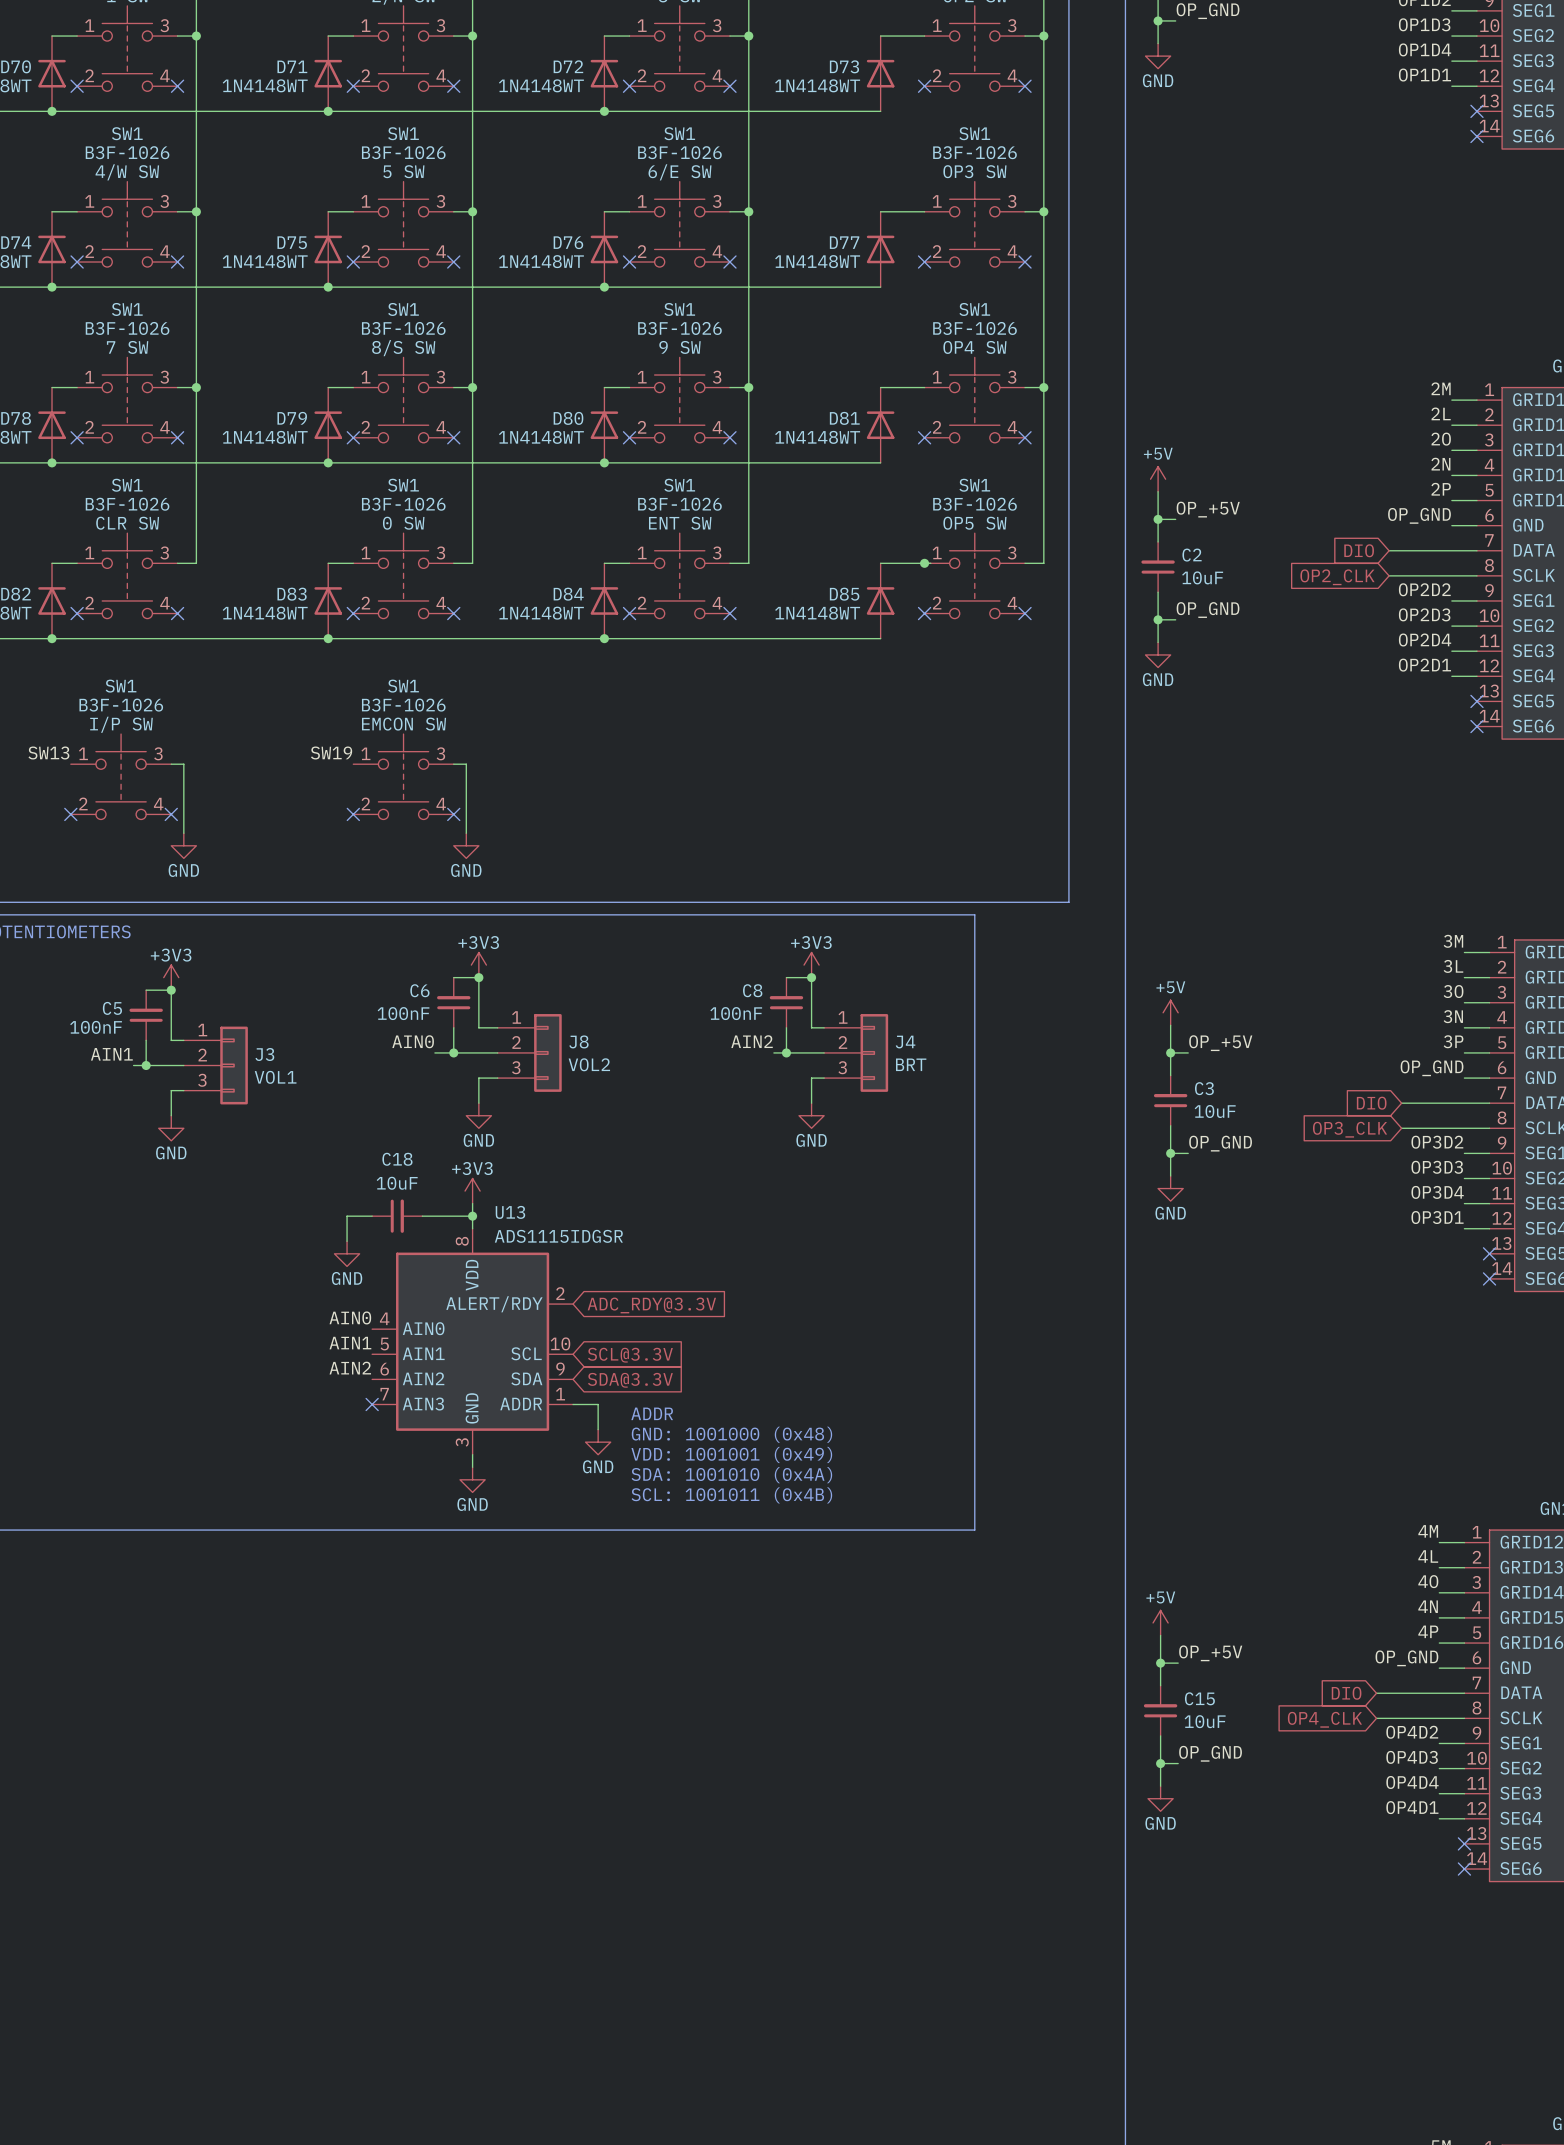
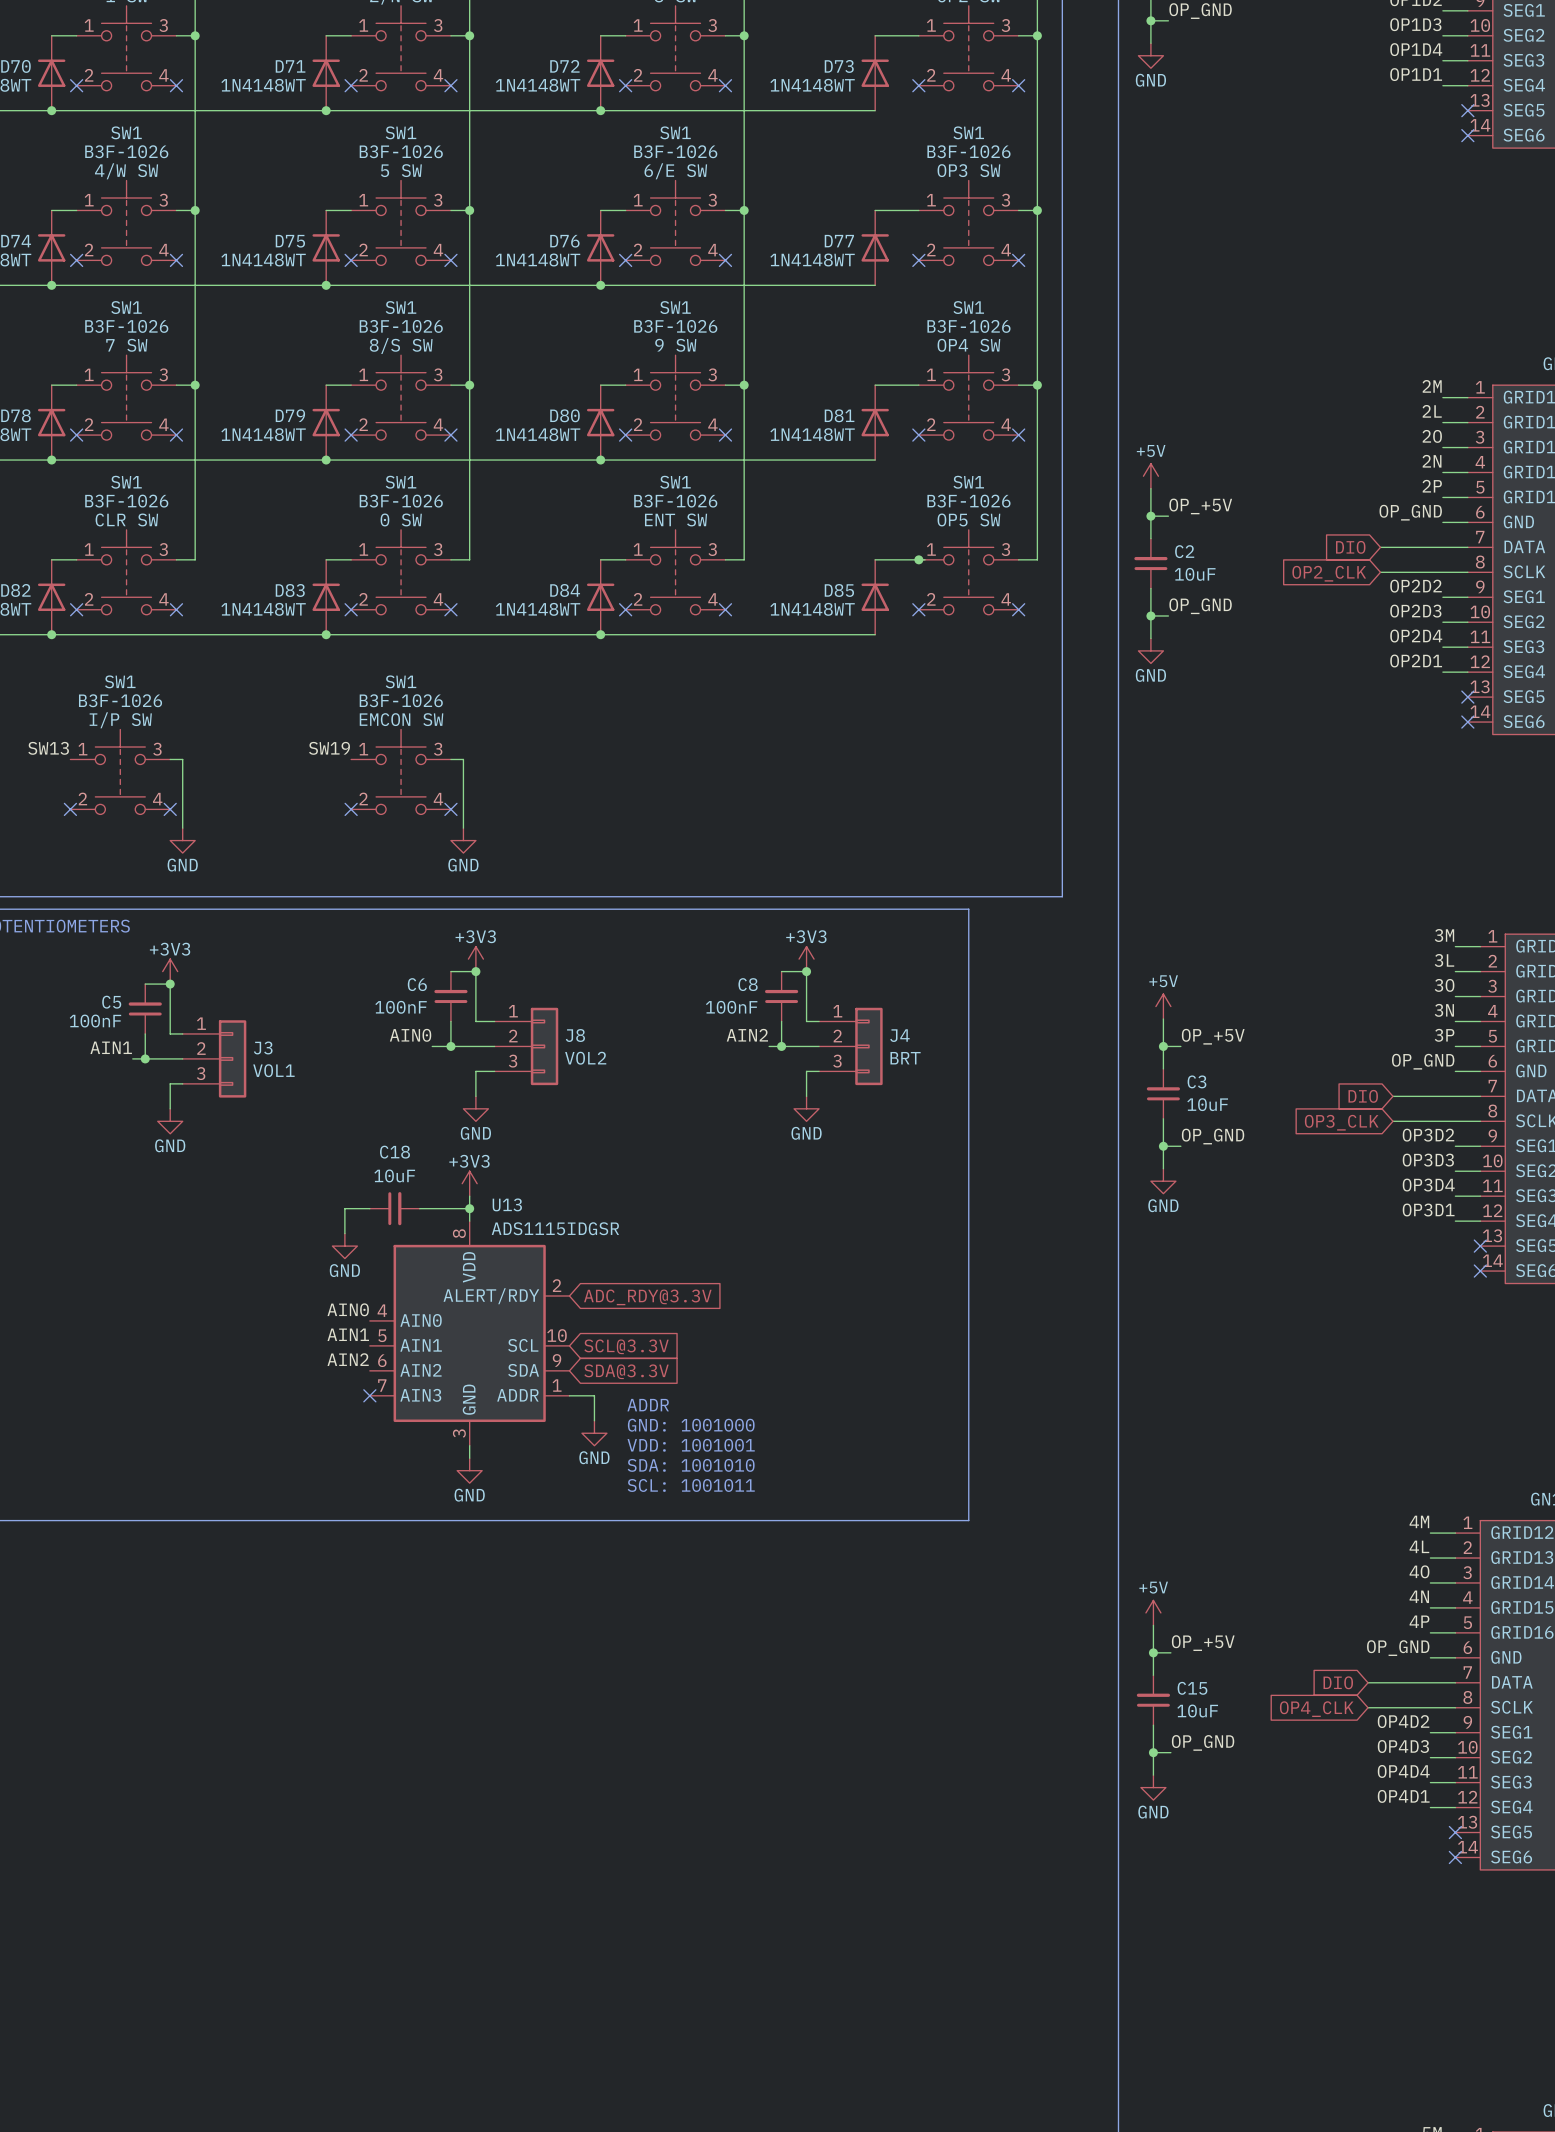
text: GND: 1001000 (0x48) (731, 1434) -> GND: 1001000 (691, 1425)
text: VDD: 1001001 (0x49) (731, 1454) -> VDD: 1001001 (691, 1445)
text: SDA: 1001010 (0x4A) (731, 1475) -> SDA: 1001010 (691, 1465)
text: SCL: 1001011 (0x4B) (731, 1495) -> SCL: 1001011 (691, 1485)

